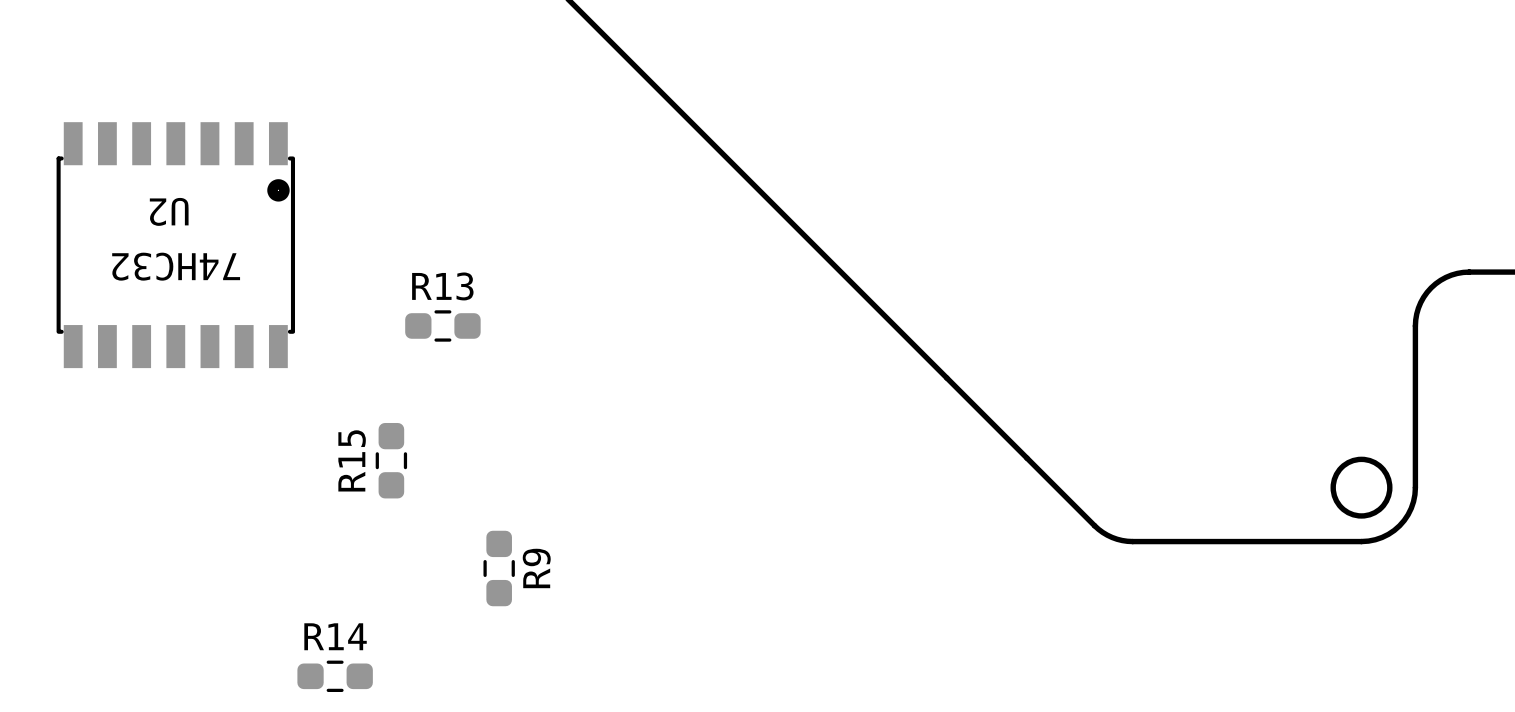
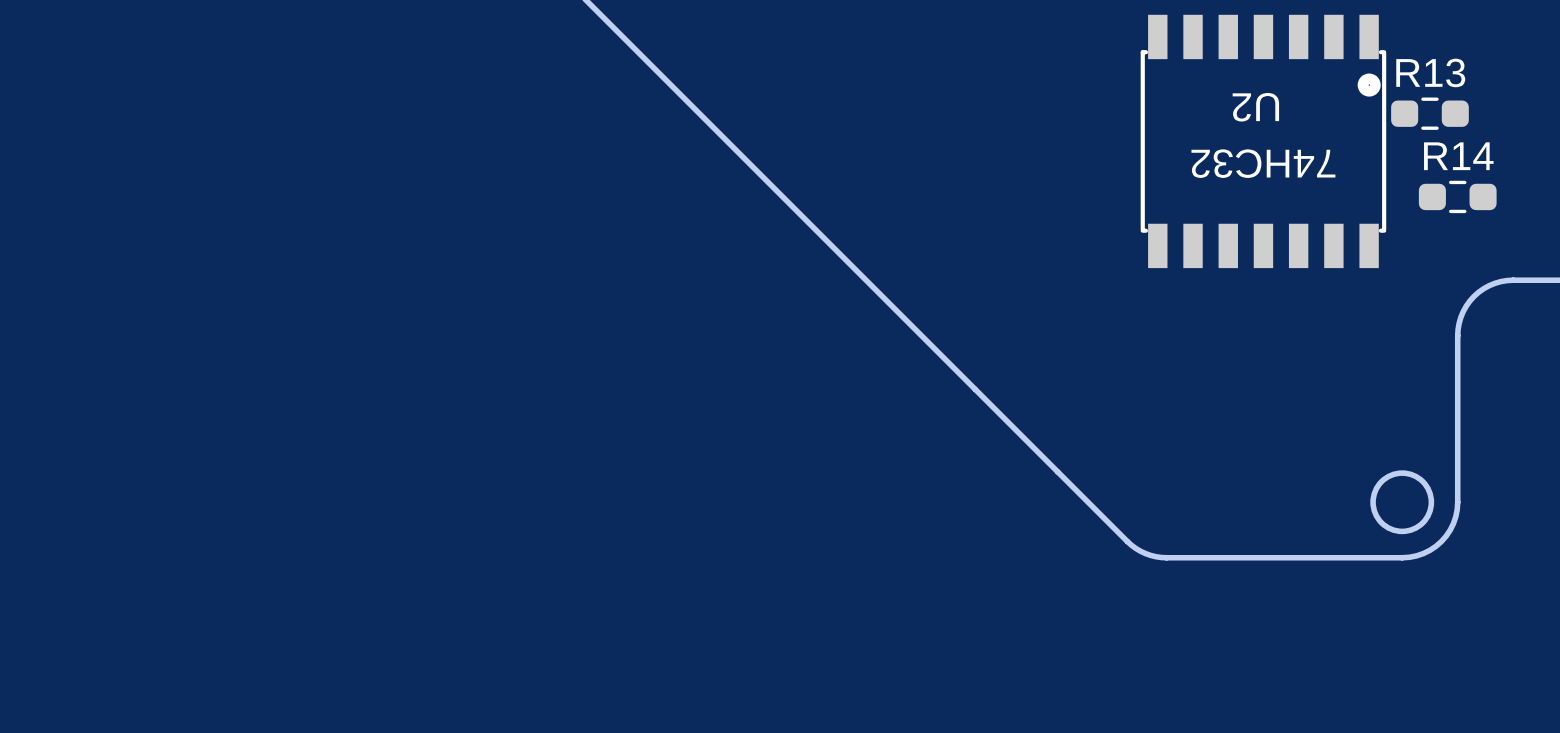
U2 position: (175, 245) -> (1263, 141)
R13 position: (442, 325) -> (1429, 113)
R15: (391, 460) -> none
R9: (499, 568) -> none
R14 position: (335, 676) -> (1457, 196)

